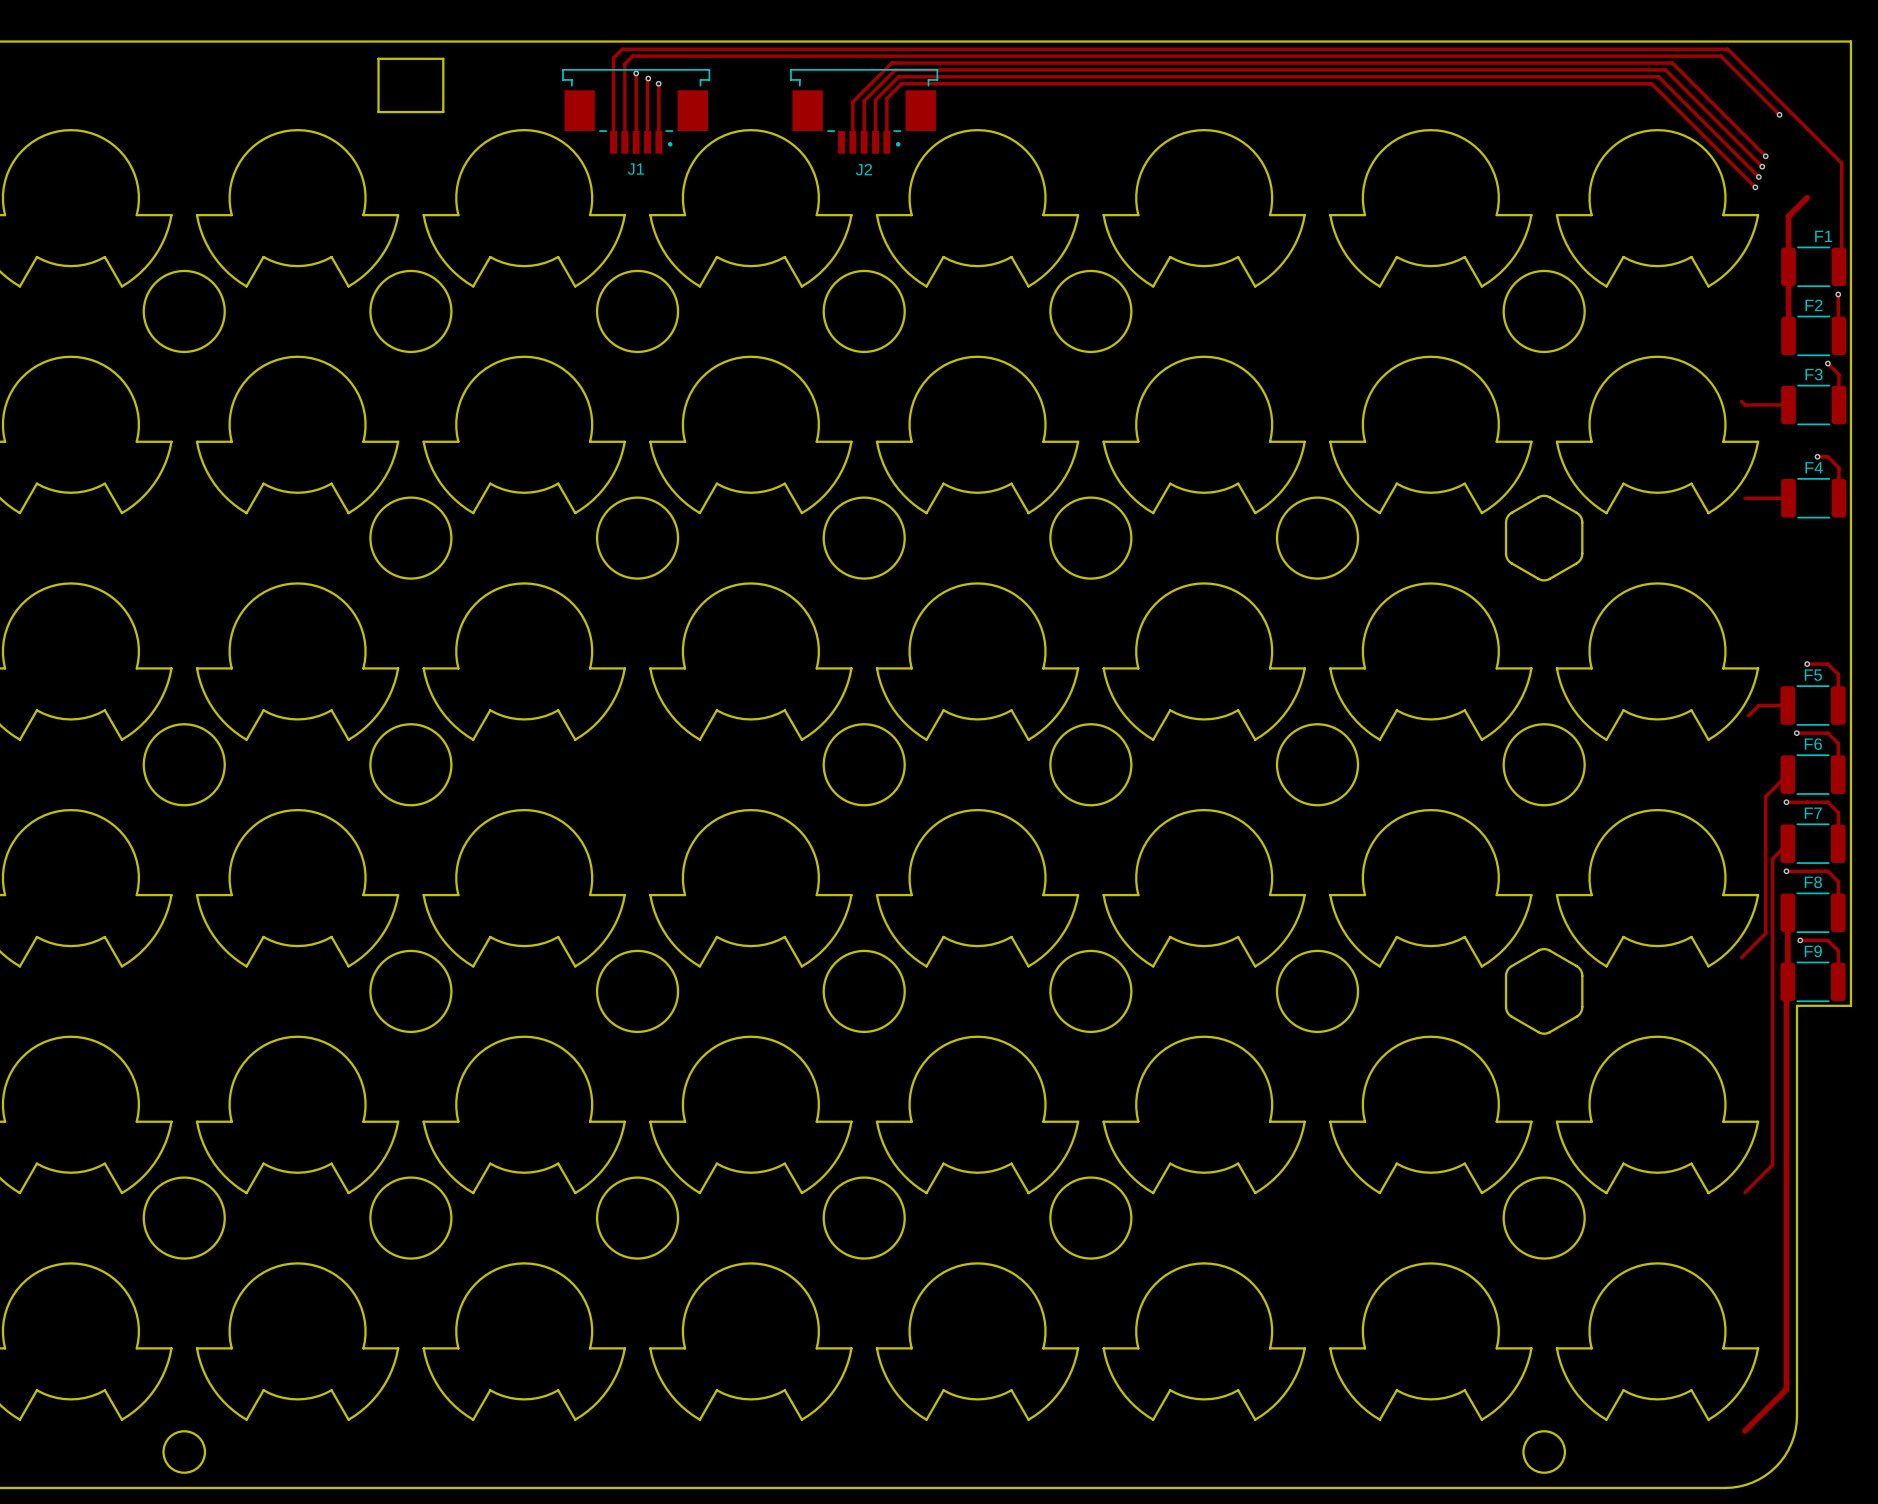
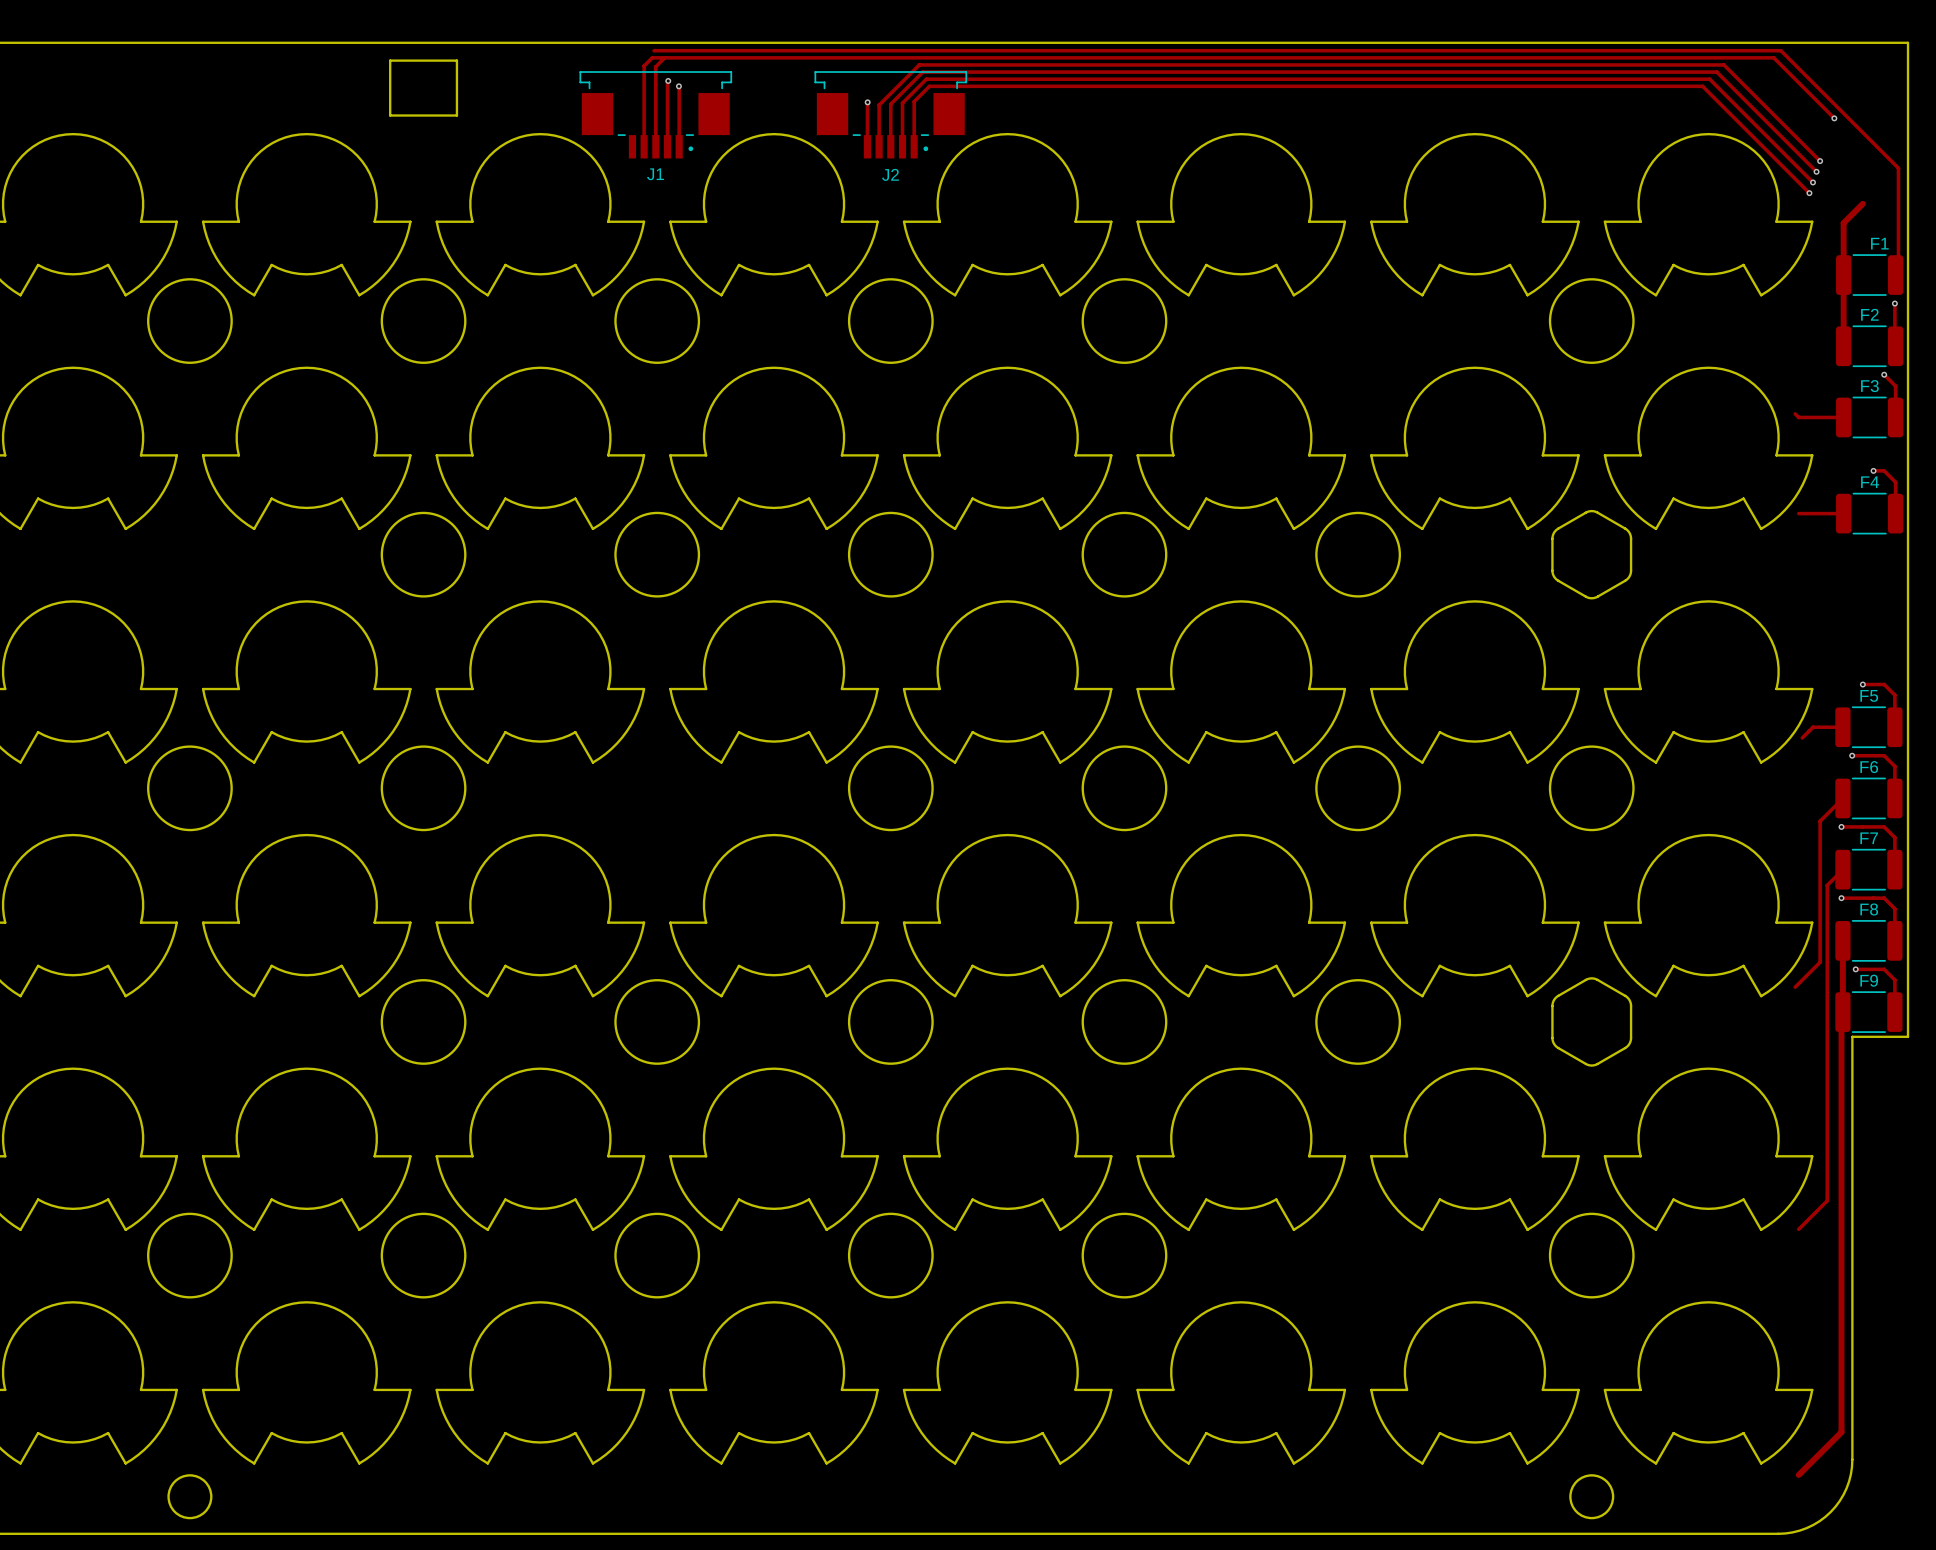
track: (634, 49) (622, 49) (613, 58) (613, 142) -> none
track: none -> (664, 57) (655, 66) (655, 75)
via: (636, 73) -> none
track: none -> (867, 102) (867, 146)
via: none -> (867, 102)

